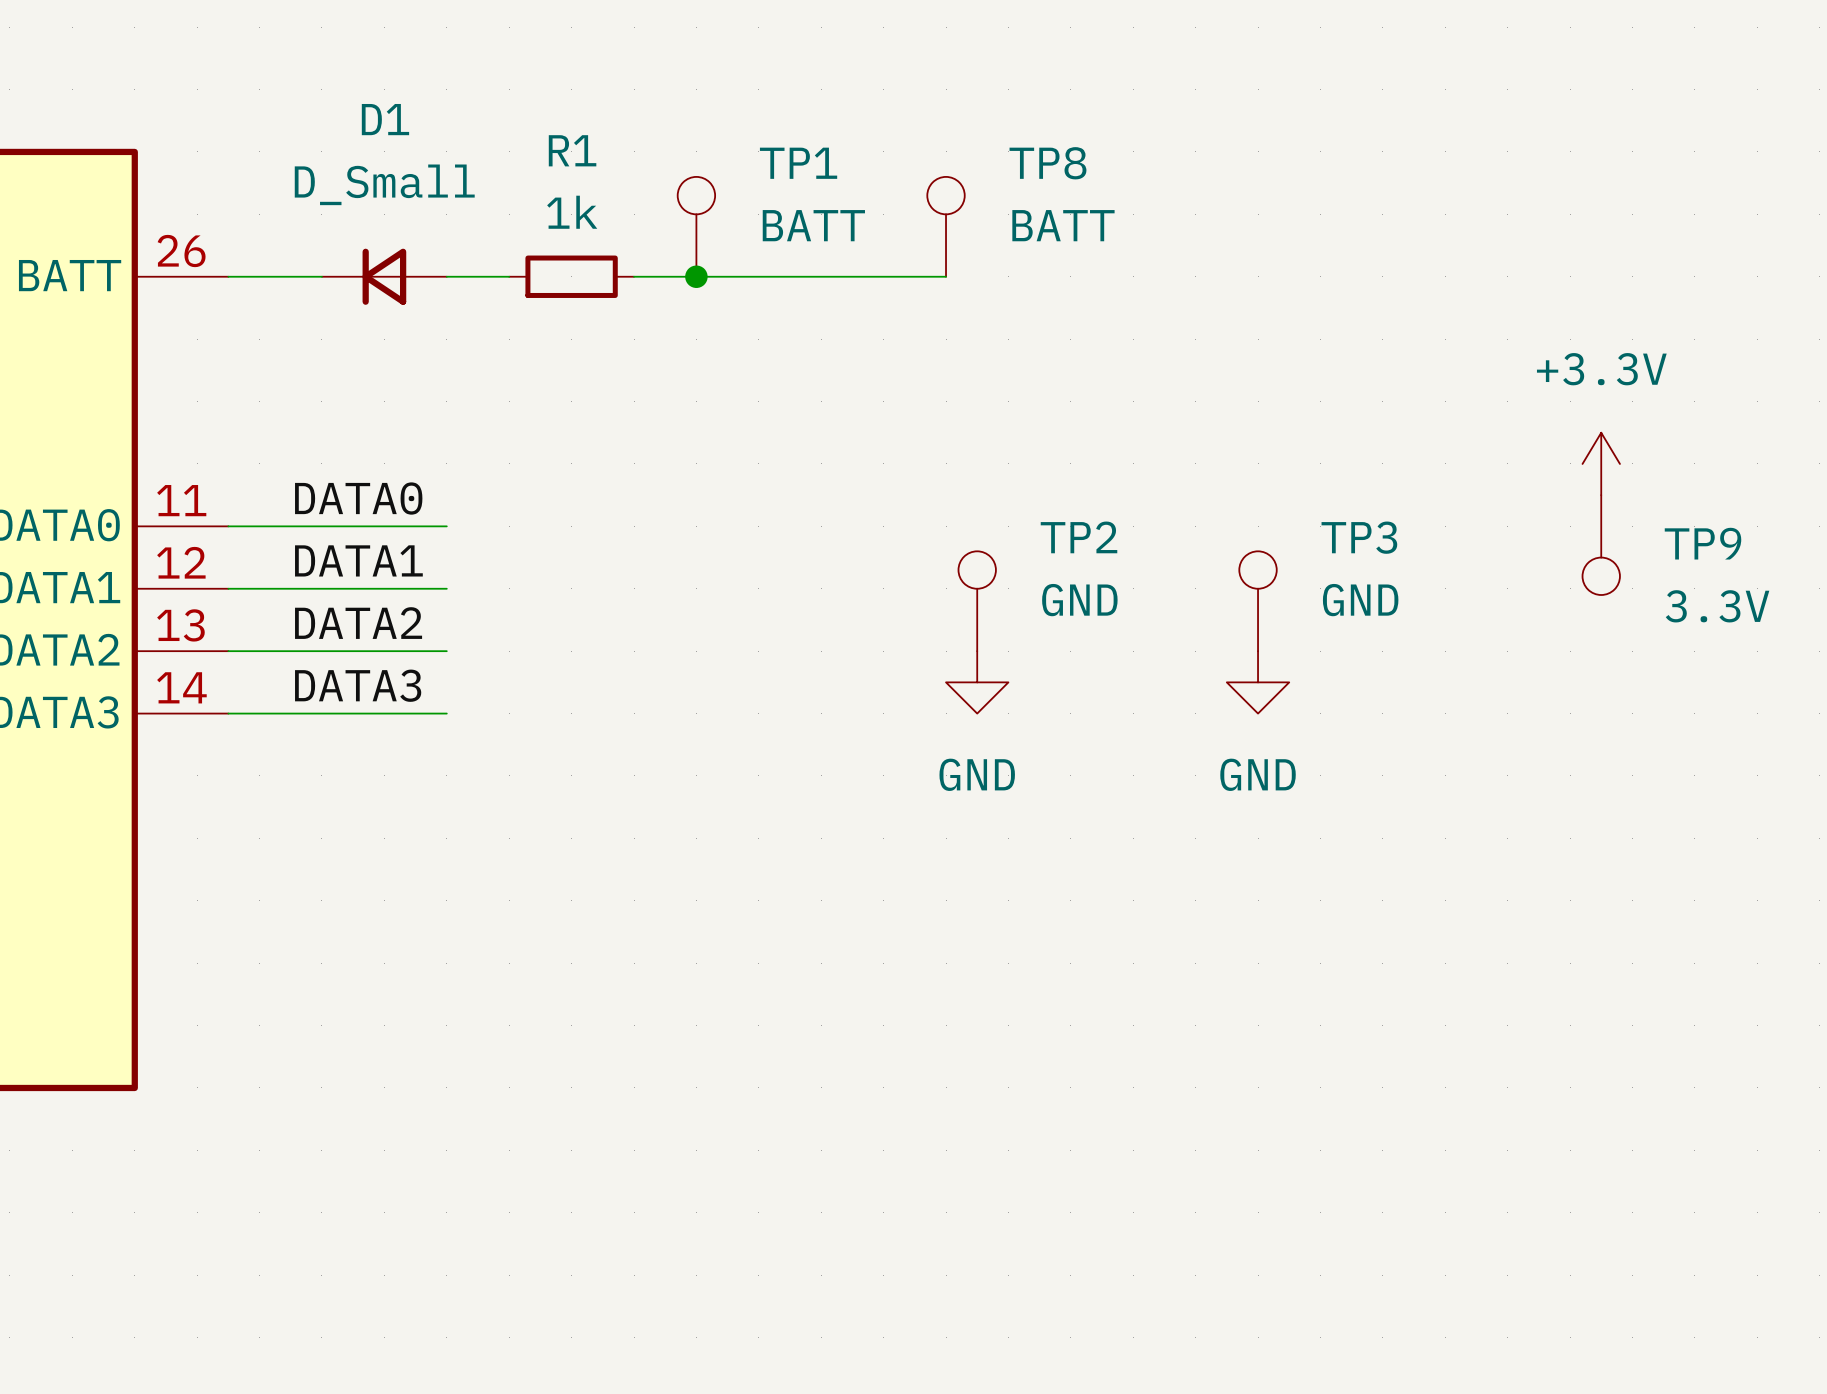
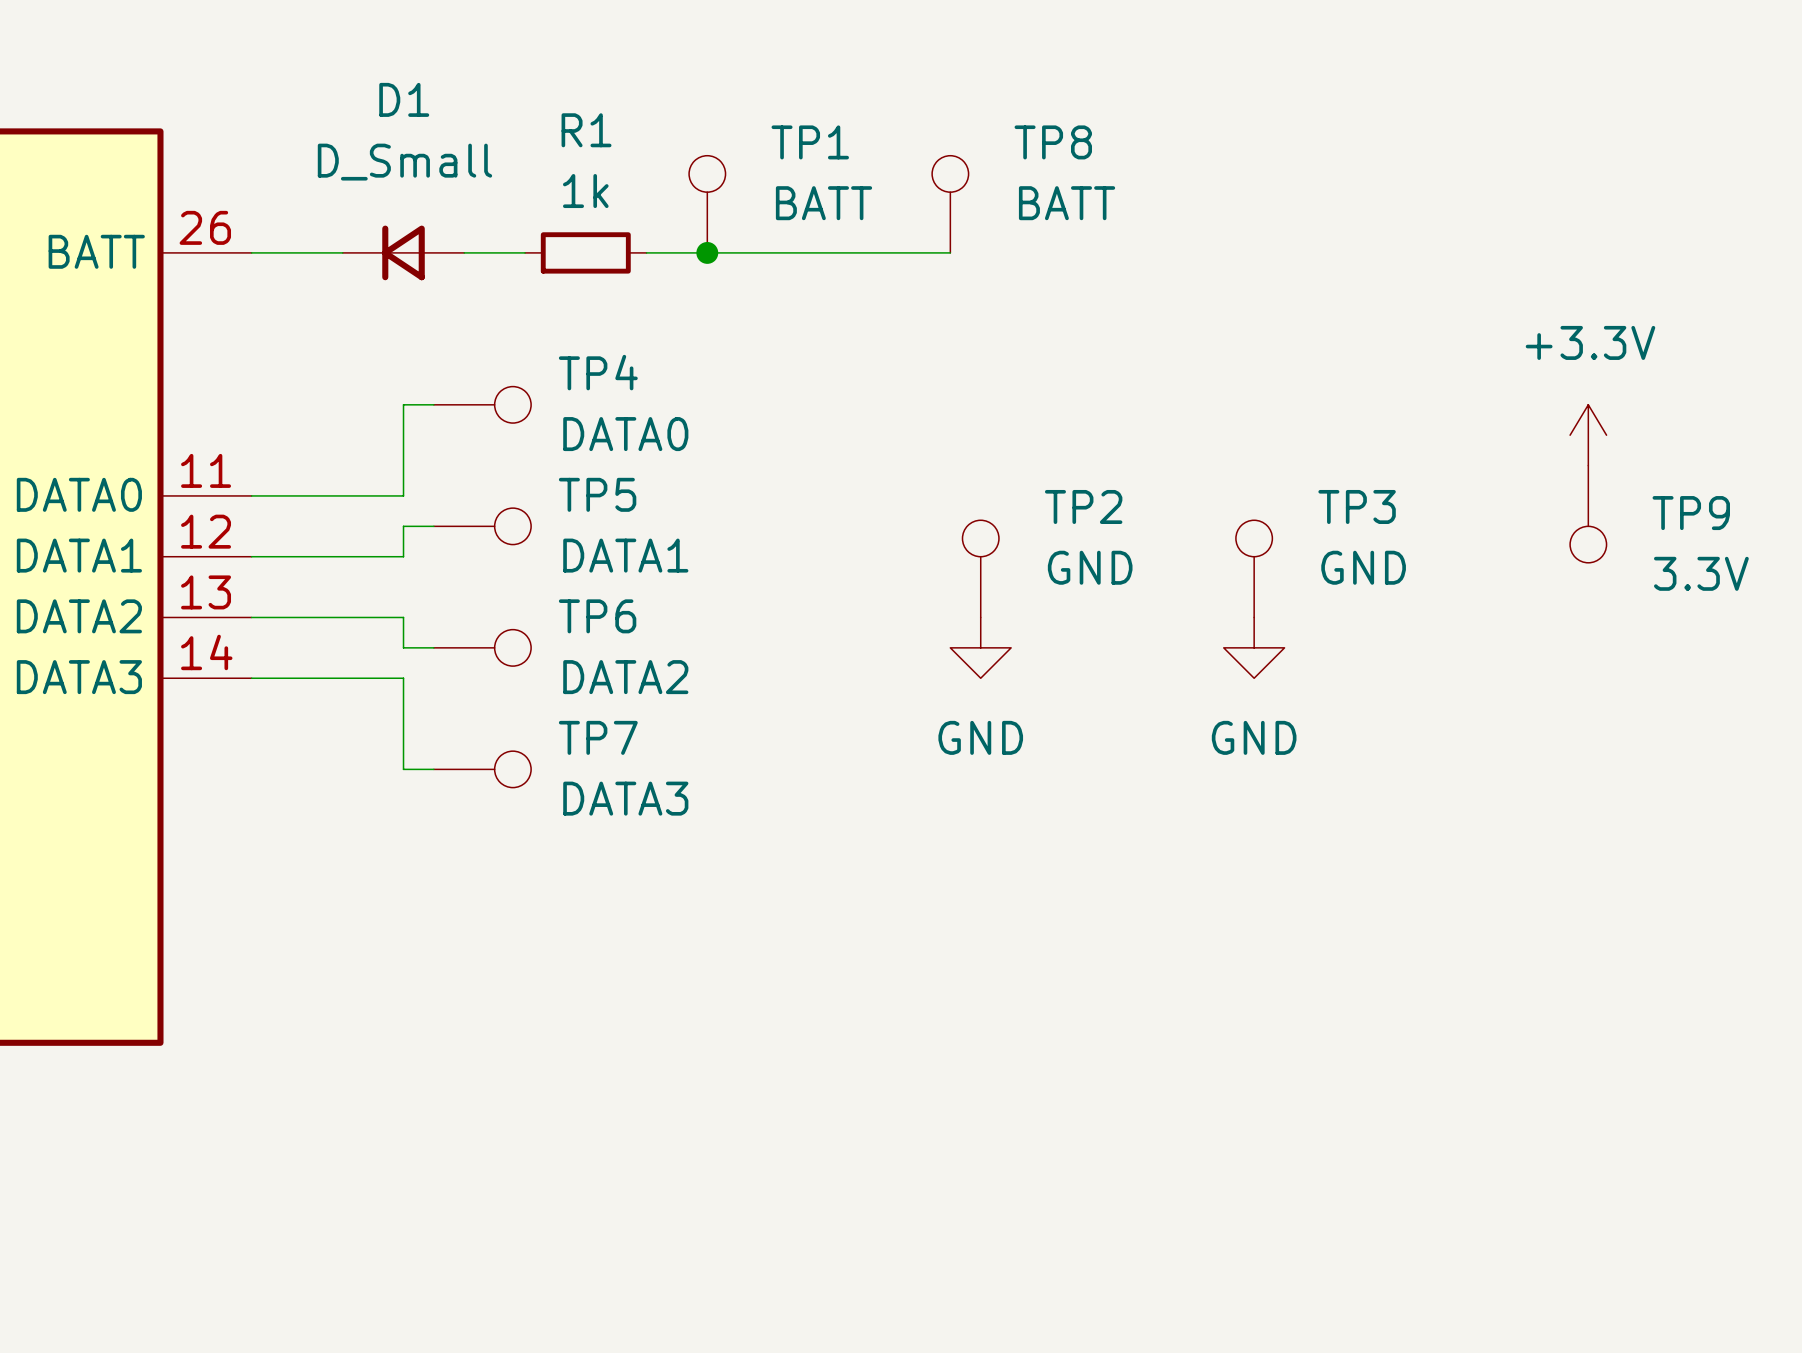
TP4: none -> DATA0 (482, 404)
label: DATA0 (358, 498) -> none
wire: (384, 526) (446, 526) -> (403, 495) (403, 404) (433, 404)
TP5: none -> DATA1 (482, 526)
label: DATA1 (358, 560) -> none
wire: (384, 588) (446, 588) -> (403, 556) (403, 526) (433, 526)
label: DATA2 (358, 623) -> none
wire: (384, 651) (446, 651) -> (403, 617) (403, 647) (433, 647)
TP6: none -> DATA2 (482, 647)
label: DATA3 (358, 685) -> none
wire: (384, 713) (446, 713) -> (403, 678) (403, 769) (433, 769)
TP7: none -> DATA3 (482, 769)

